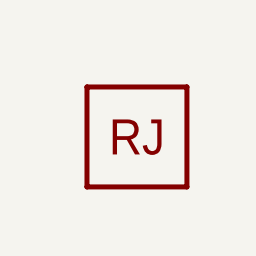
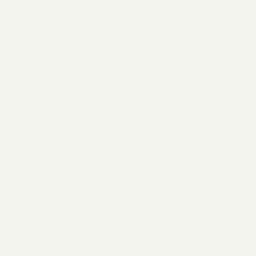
part: (136, 136) -> none

